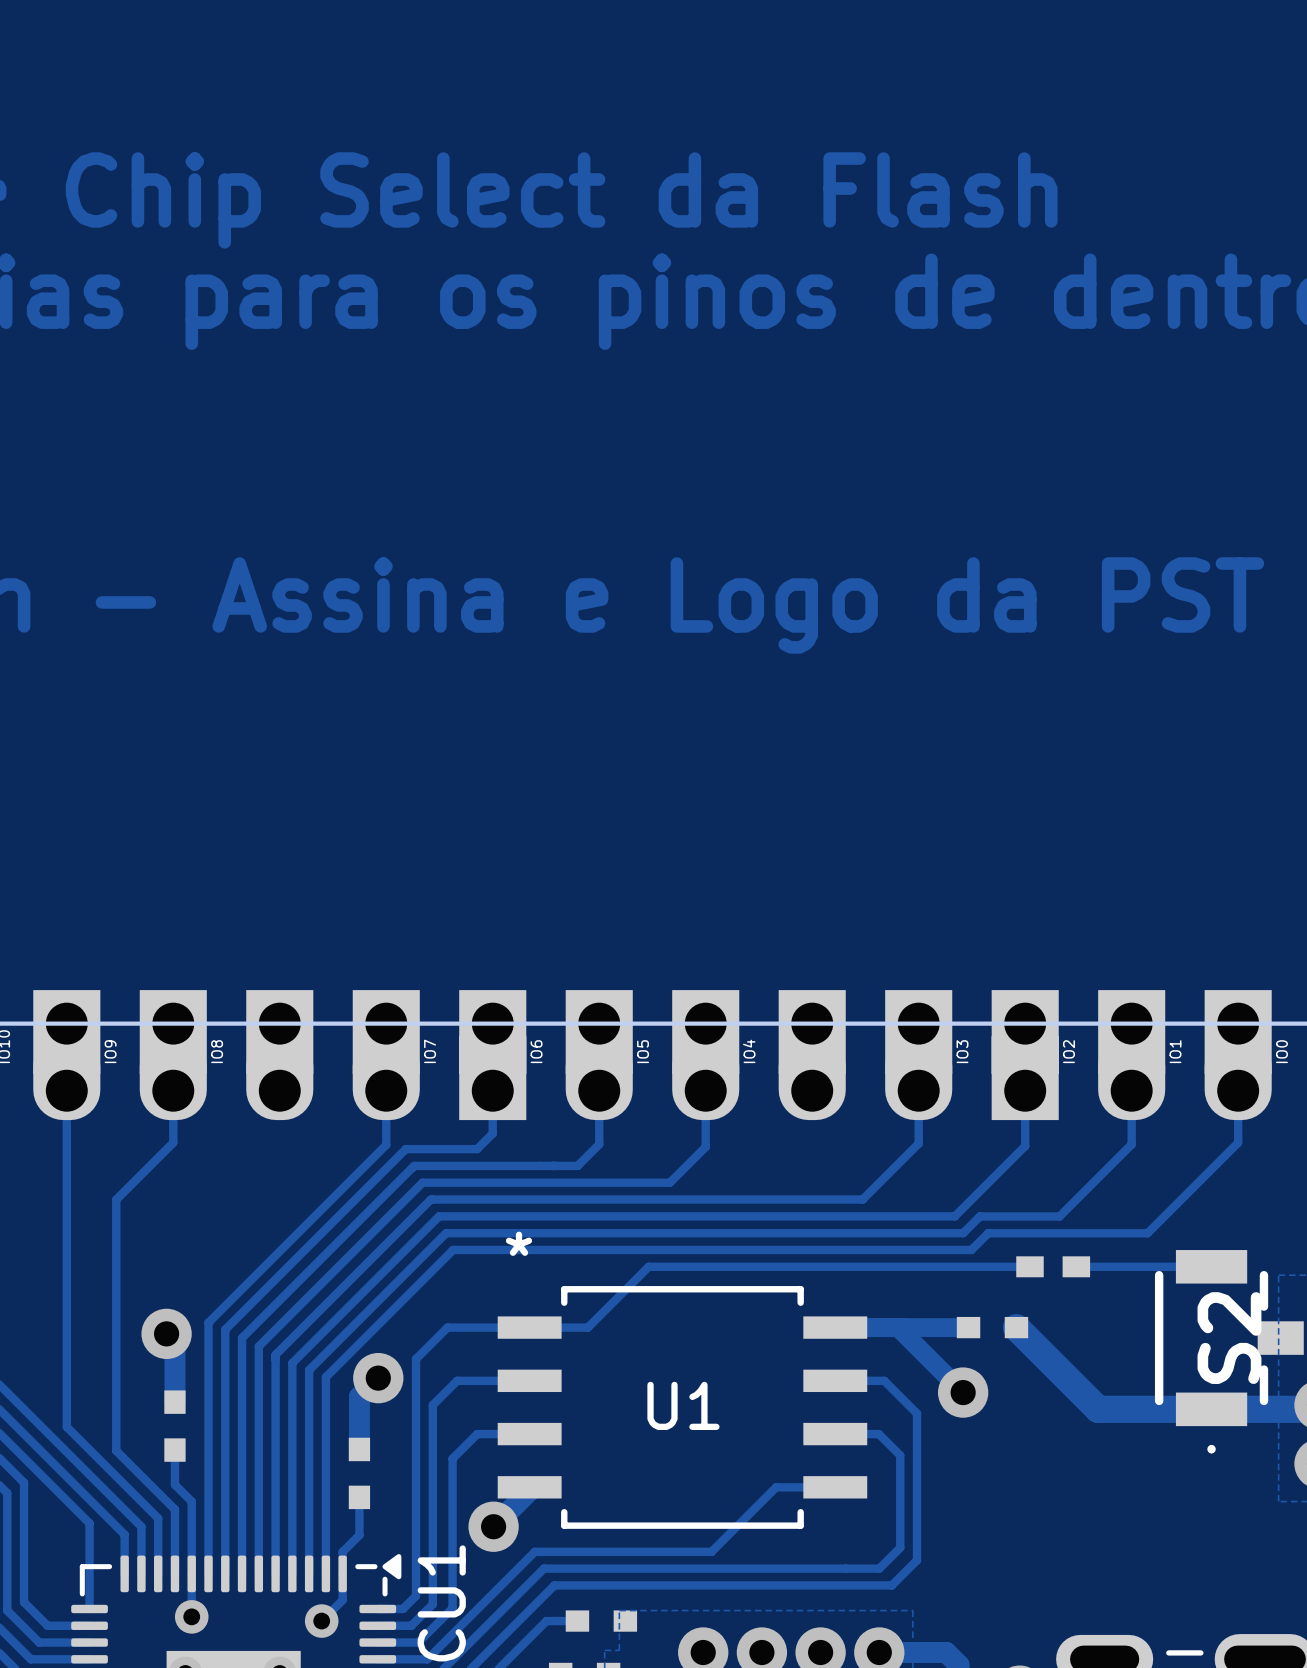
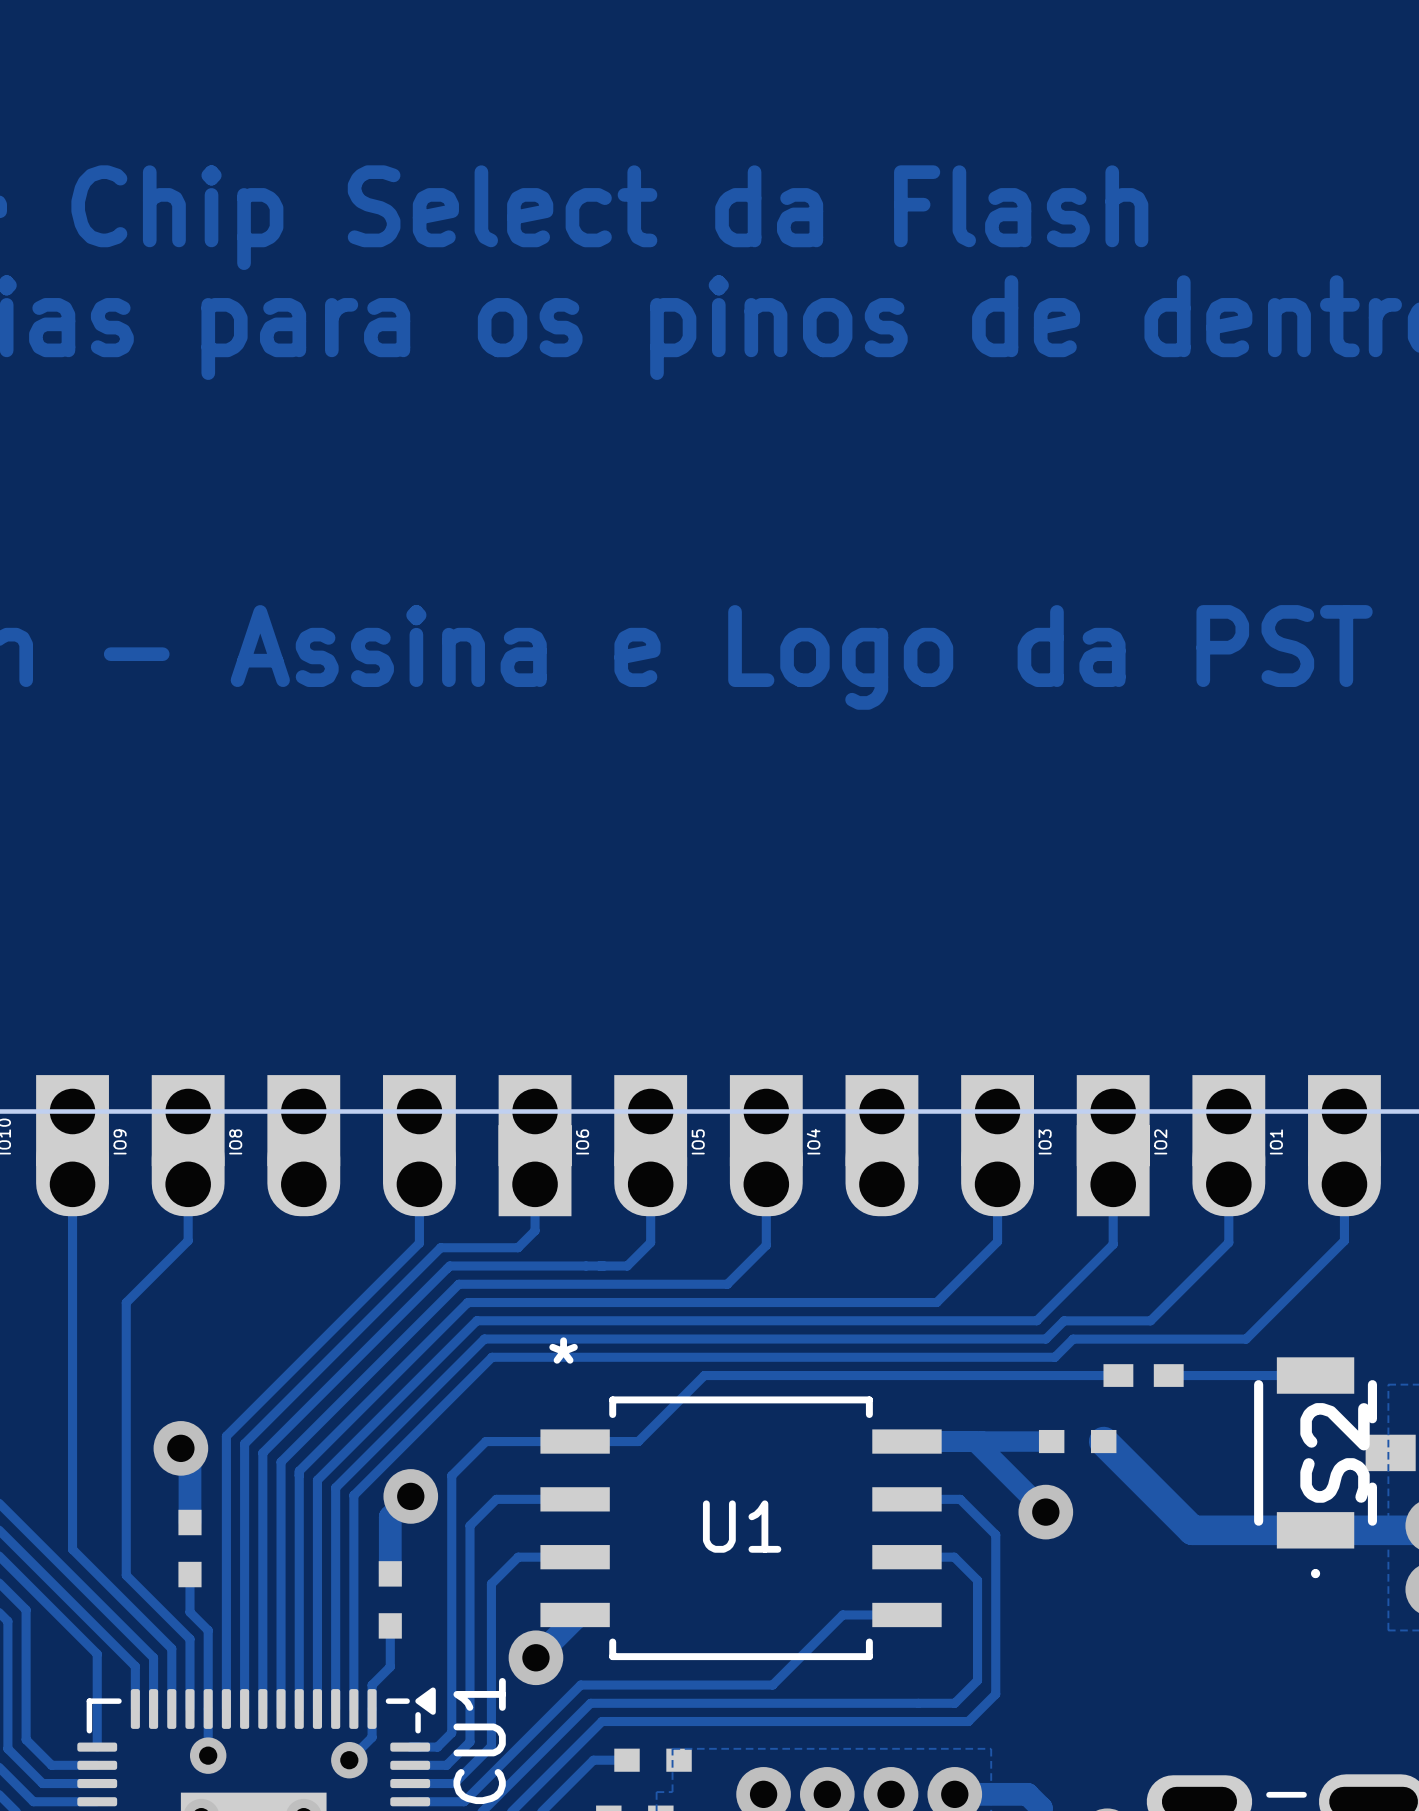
text: IO7 (430, 1051) -> none
text: IO0 (1281, 1051) -> none

